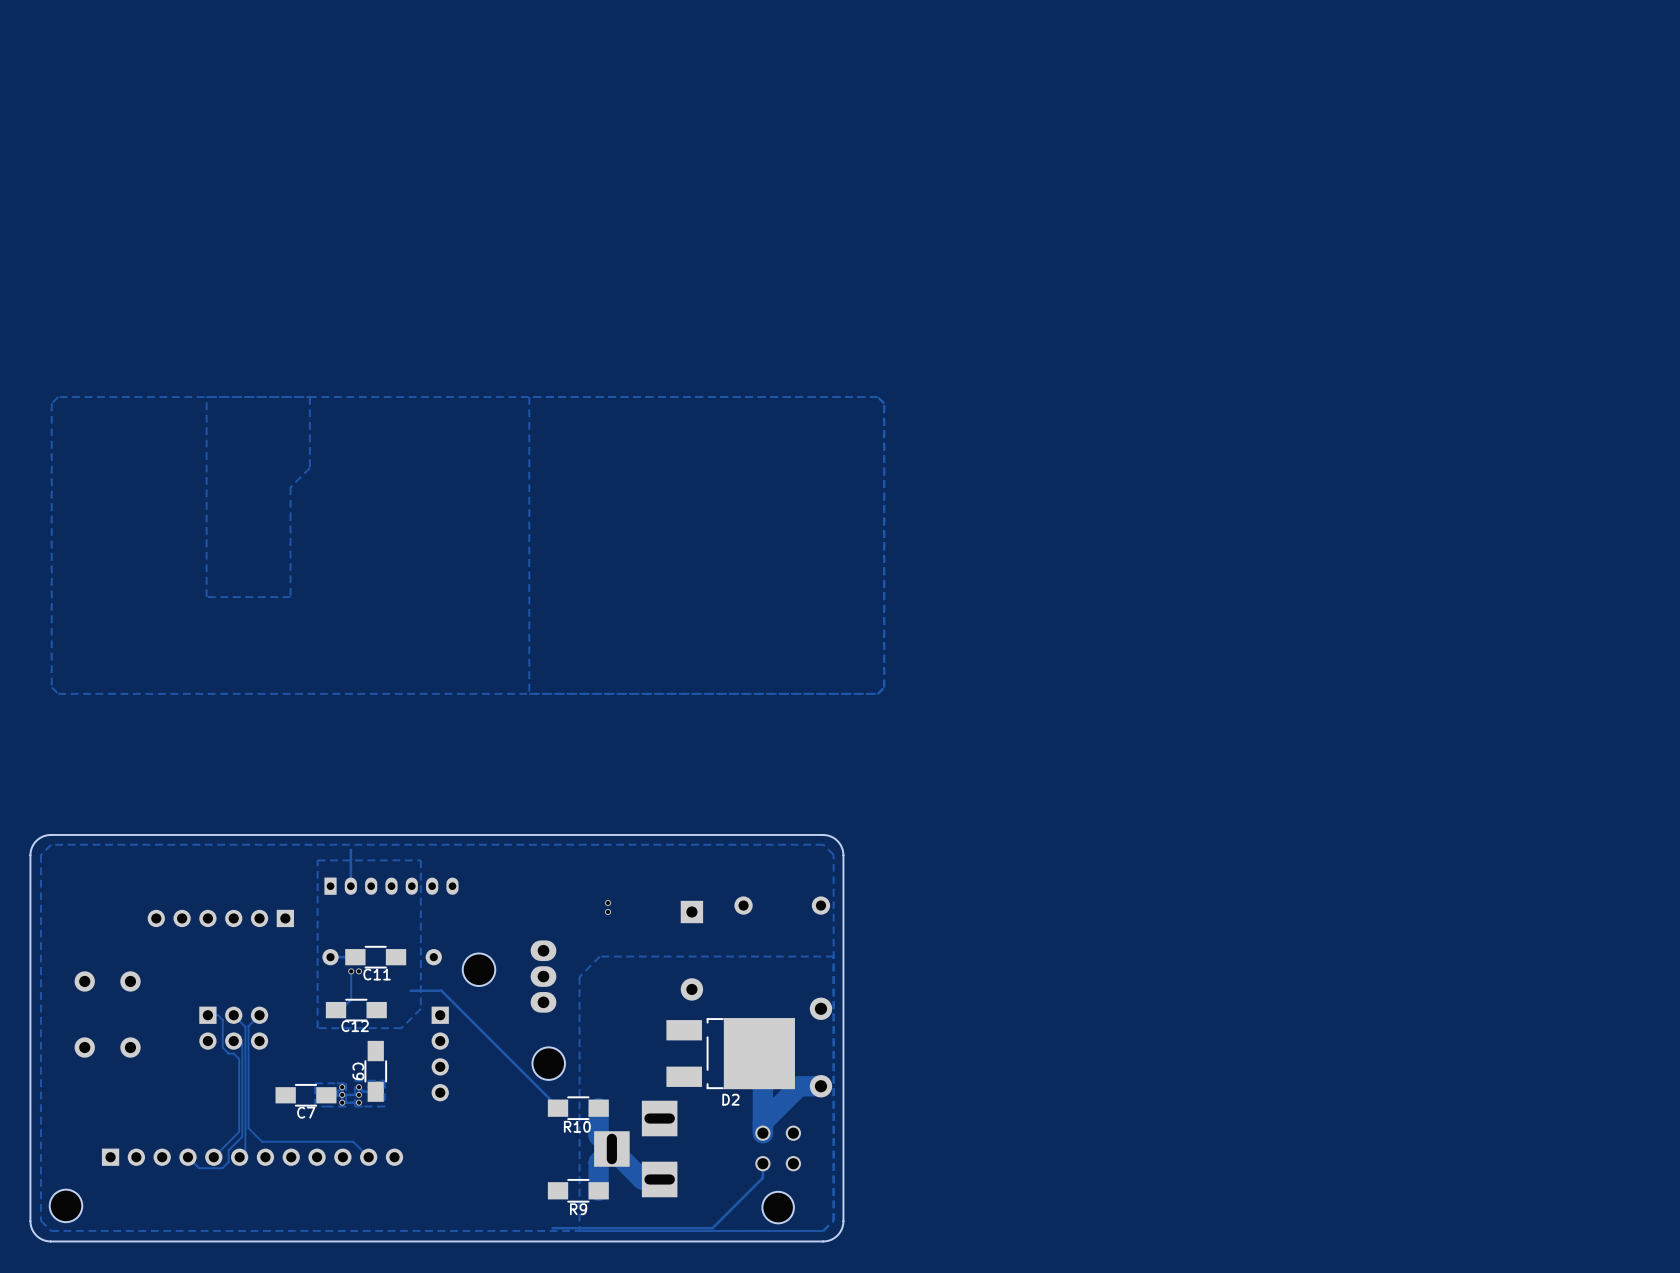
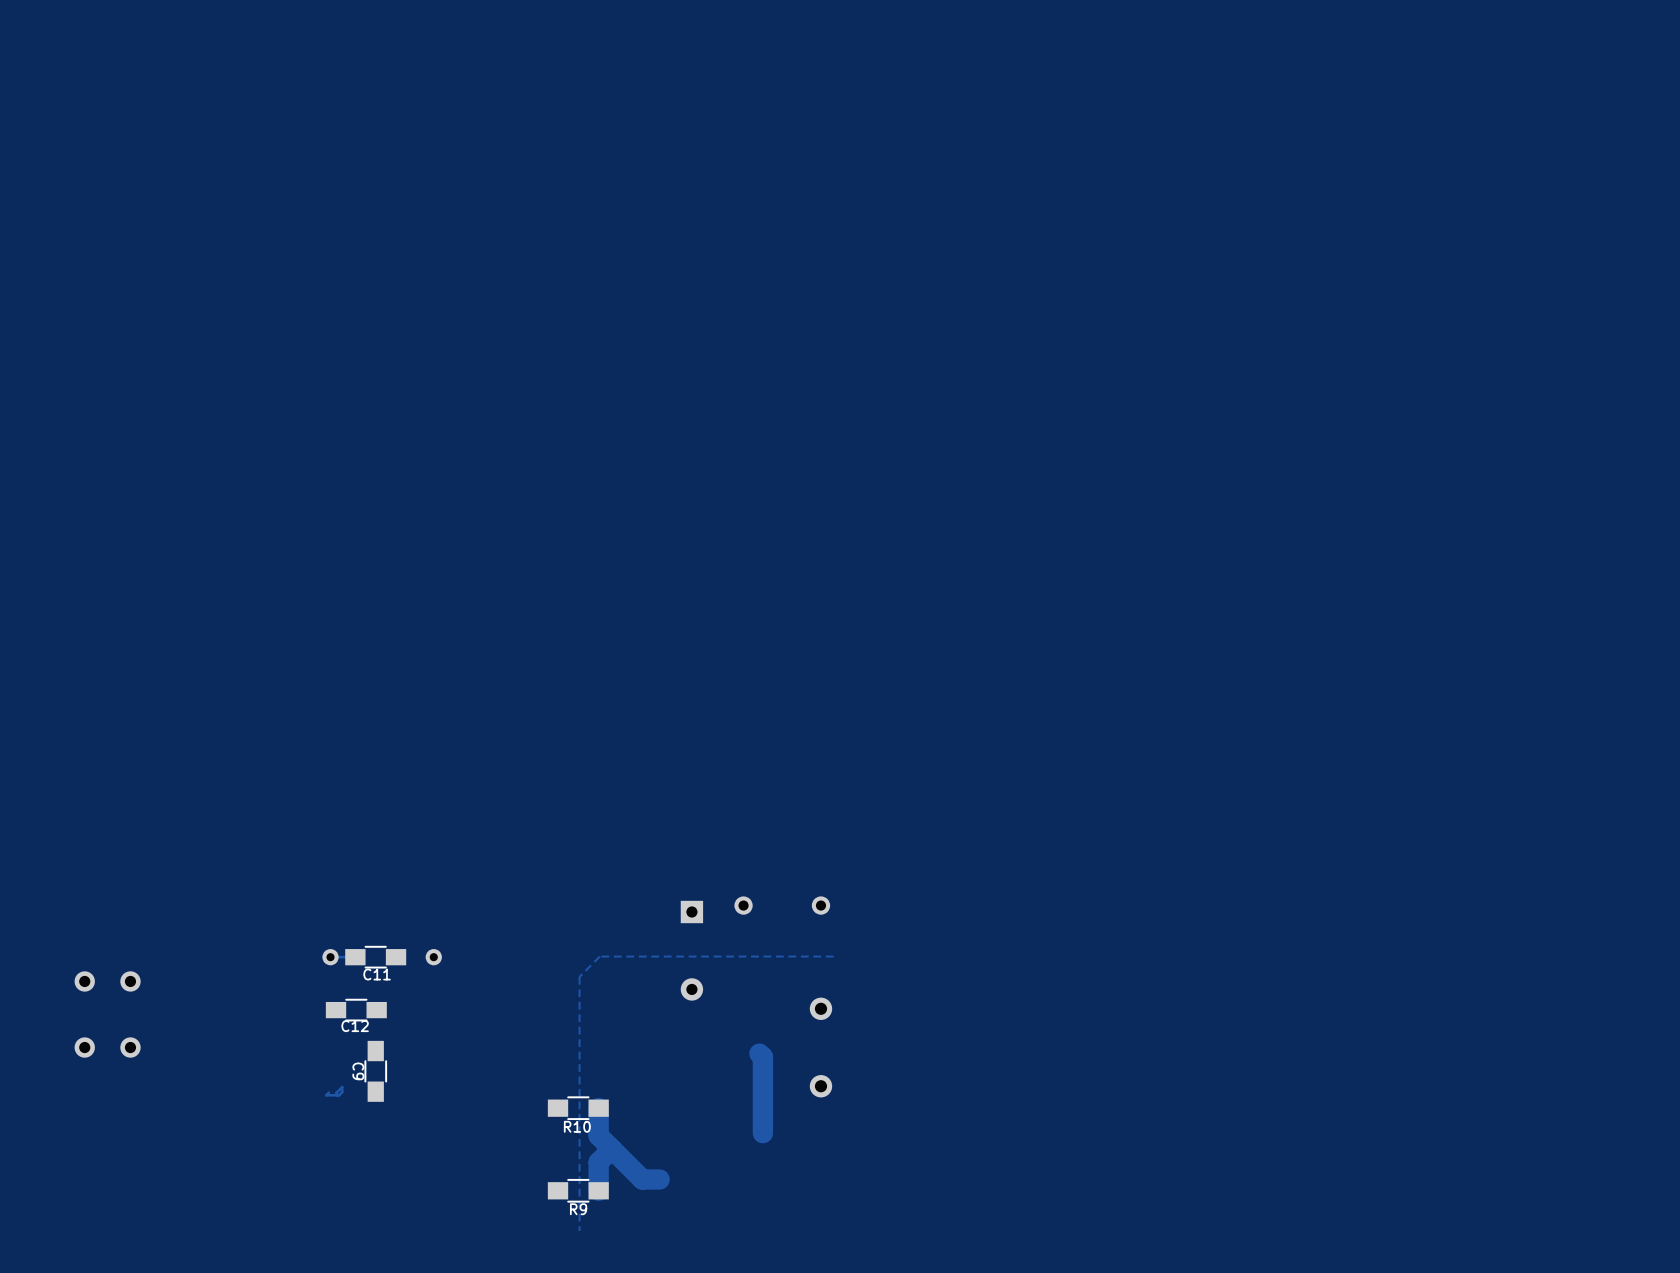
zone outline: (309, 397) (309, 468) (290, 487) (290, 597) (206, 597) (206, 397) -> none
zone outline: (529, 397) (529, 693) -> none
zone outline: (877, 397) (884, 403) (884, 687) (877, 693) (58, 693) (51, 687) (51, 403) (58, 397) (877, 397) -> none
board edge: (823, 834) (50, 834) (40, 837) (33, 845) (30, 855) (30, 1221) (33, 1231) (40, 1238) (50, 1241) (823, 1241) (833, 1238) (840, 1231) (843, 1221) (843, 855) (841, 847) (837, 840) (830, 836) (823, 834) -> none
zone outline: (823, 844) (833, 854) (833, 1220) (823, 1230) (51, 1230) (40, 1220) (40, 854) (51, 844) (823, 844) -> none
track: (351, 850) (350, 886) -> none
zone outline: (420, 860) (317, 860) (317, 1028) (401, 1028) (420, 1008) (420, 860) -> none
part: (391, 886) -> none
via: (608, 902) -> none
via: (608, 912) -> none
part: (220, 918) -> none
part: (479, 969) -> none
track: (351, 971) (351, 999) (340, 1010) (336, 1010) -> none
via: (351, 971) -> none
via: (358, 971) -> none
part: (543, 976) -> none
track: (410, 990) (441, 990) (558, 1108) -> none
track: (207, 1015) (218, 1015) (222, 1019) (222, 1047) (228, 1053) (233, 1053) (239, 1059) (239, 1131) (213, 1157) -> none
track: (233, 1015) (245, 1026) (245, 1151) (239, 1157) -> none
track: (259, 1015) (248, 1026) (248, 1128) (262, 1141) (353, 1141) (368, 1157) -> none
part: (233, 1028) -> none
track: (233, 1041) (239, 1041) (242, 1044) (242, 1136) (228, 1150) (228, 1162) (222, 1168) (198, 1168) (188, 1157) -> none
part: (440, 1053) -> none
D2: (730, 1053) -> none
part: (548, 1063) -> none
zone outline: (384, 1080) (355, 1080) (355, 1106) (384, 1106) (384, 1080) -> none
zone outline: (346, 1083) (315, 1083) (315, 1106) (346, 1106) (346, 1083) -> none
track: (820, 1086) (799, 1086) (762, 1122) -> none
via: (342, 1087) -> none
via: (358, 1087) -> none
track: (375, 1091) (363, 1091) (358, 1087) (358, 1094) (342, 1094) (342, 1102) (358, 1102) -> none
via: (342, 1094) -> none
via: (358, 1094) -> none
C7: (306, 1095) -> none
via: (342, 1102) -> none
via: (358, 1102) -> none
part: (635, 1149) -> none
part: (252, 1157) -> none
track: (762, 1163) (762, 1177) (712, 1228) (552, 1228) -> none
part: (778, 1174) -> none
part: (65, 1205) -> none

